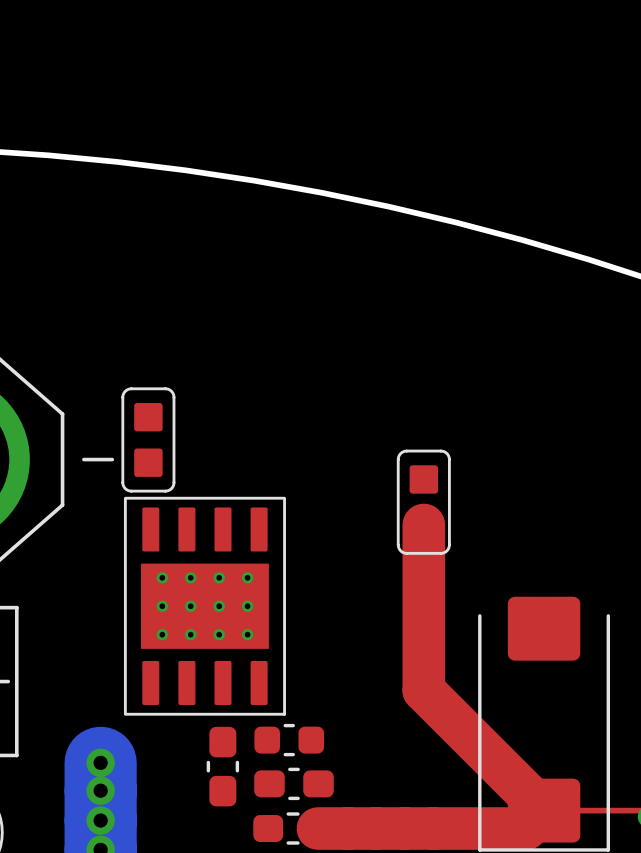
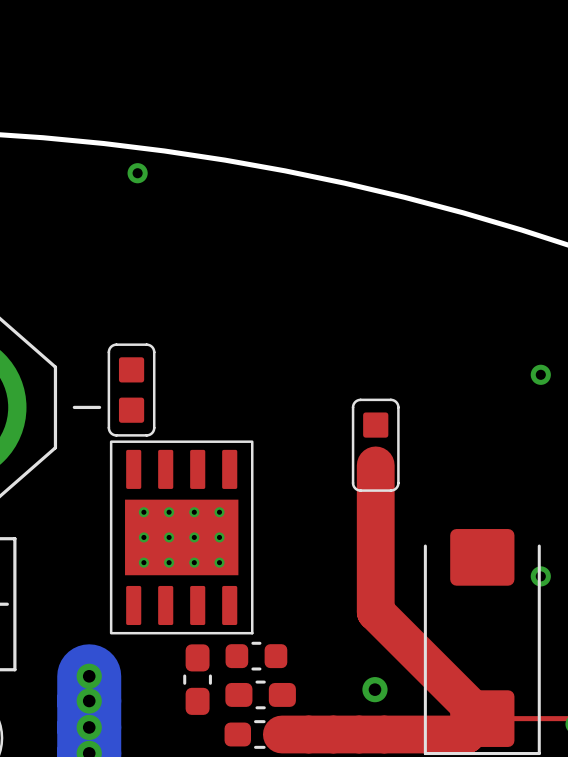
via: none -> (137, 173)
via: none -> (540, 374)
via: none -> (540, 576)
via: none -> (374, 689)

